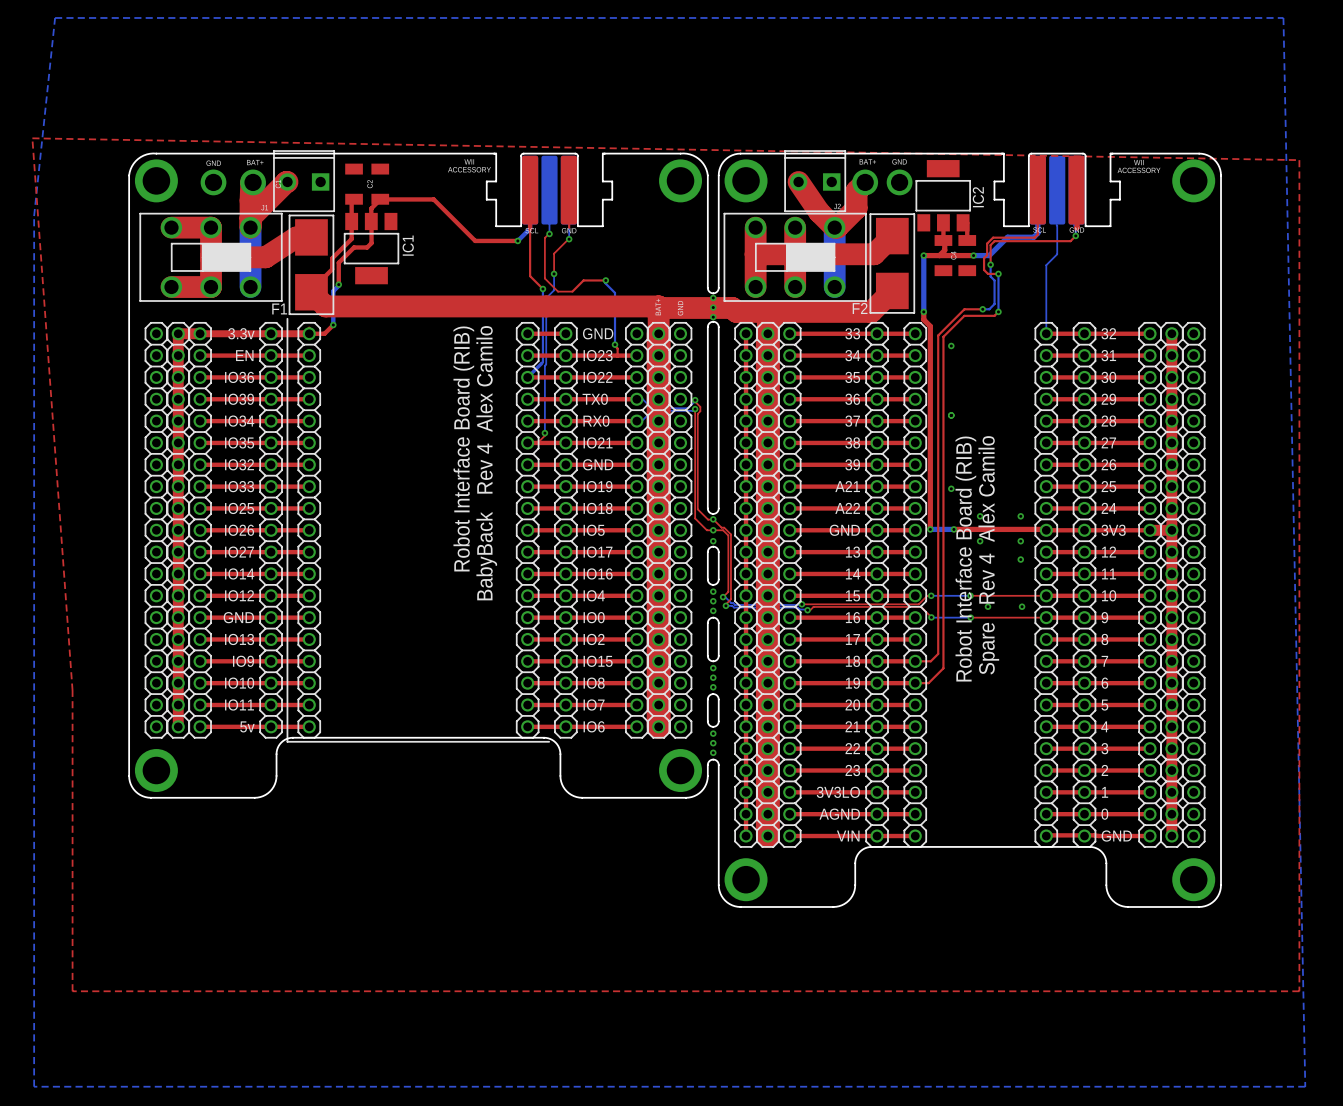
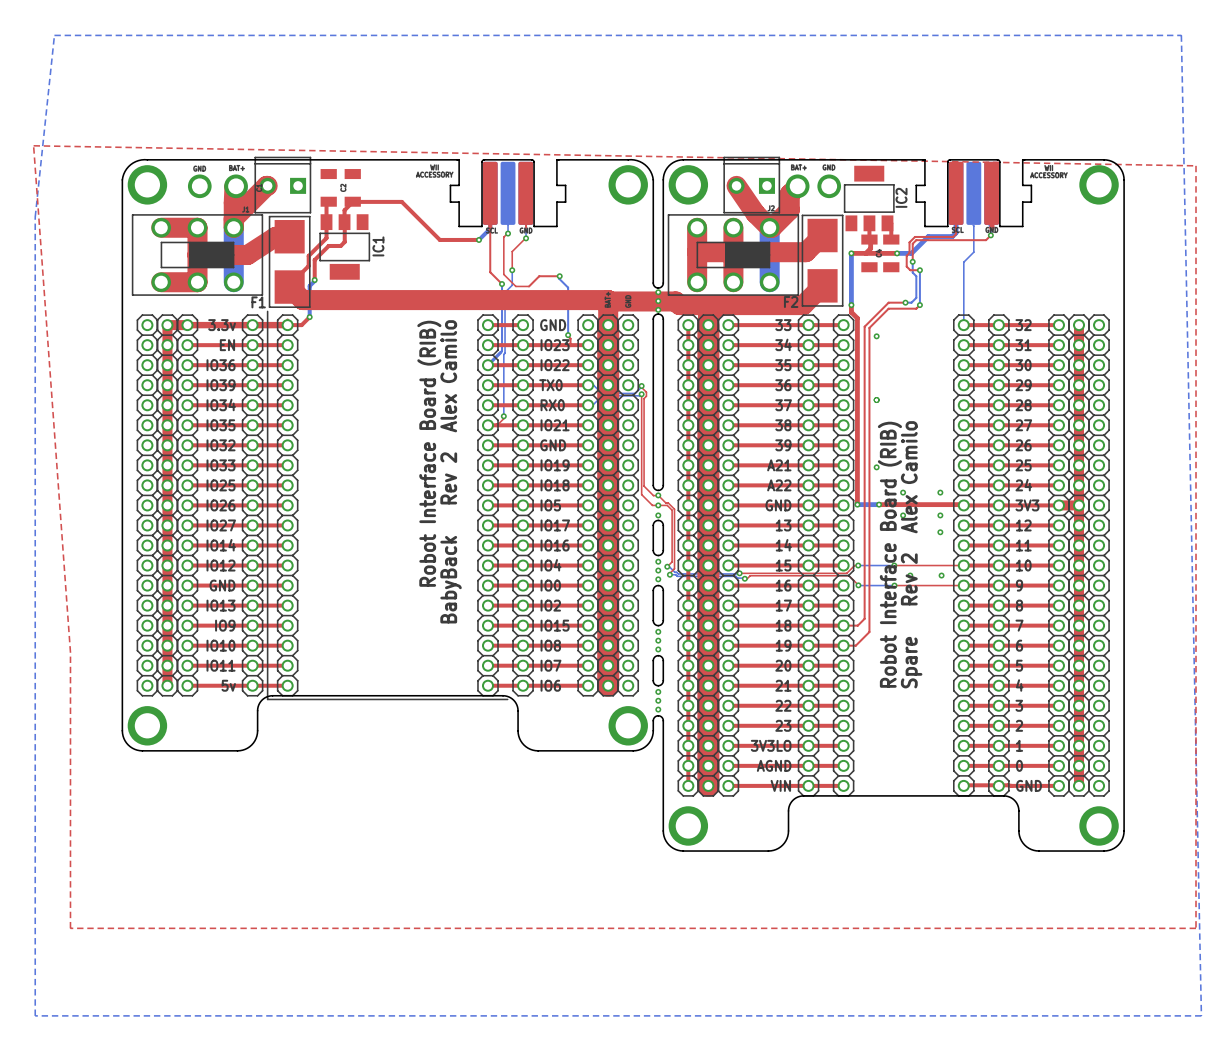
text: BabyBack Rev 4 Alex Camilo (486, 463) -> BabyBack Rev 2 Alex Camilo (451, 471)
text: Spare Rev 4 Alex Camilo (988, 555) -> Spare Rev 2 Alex Camilo (911, 554)

